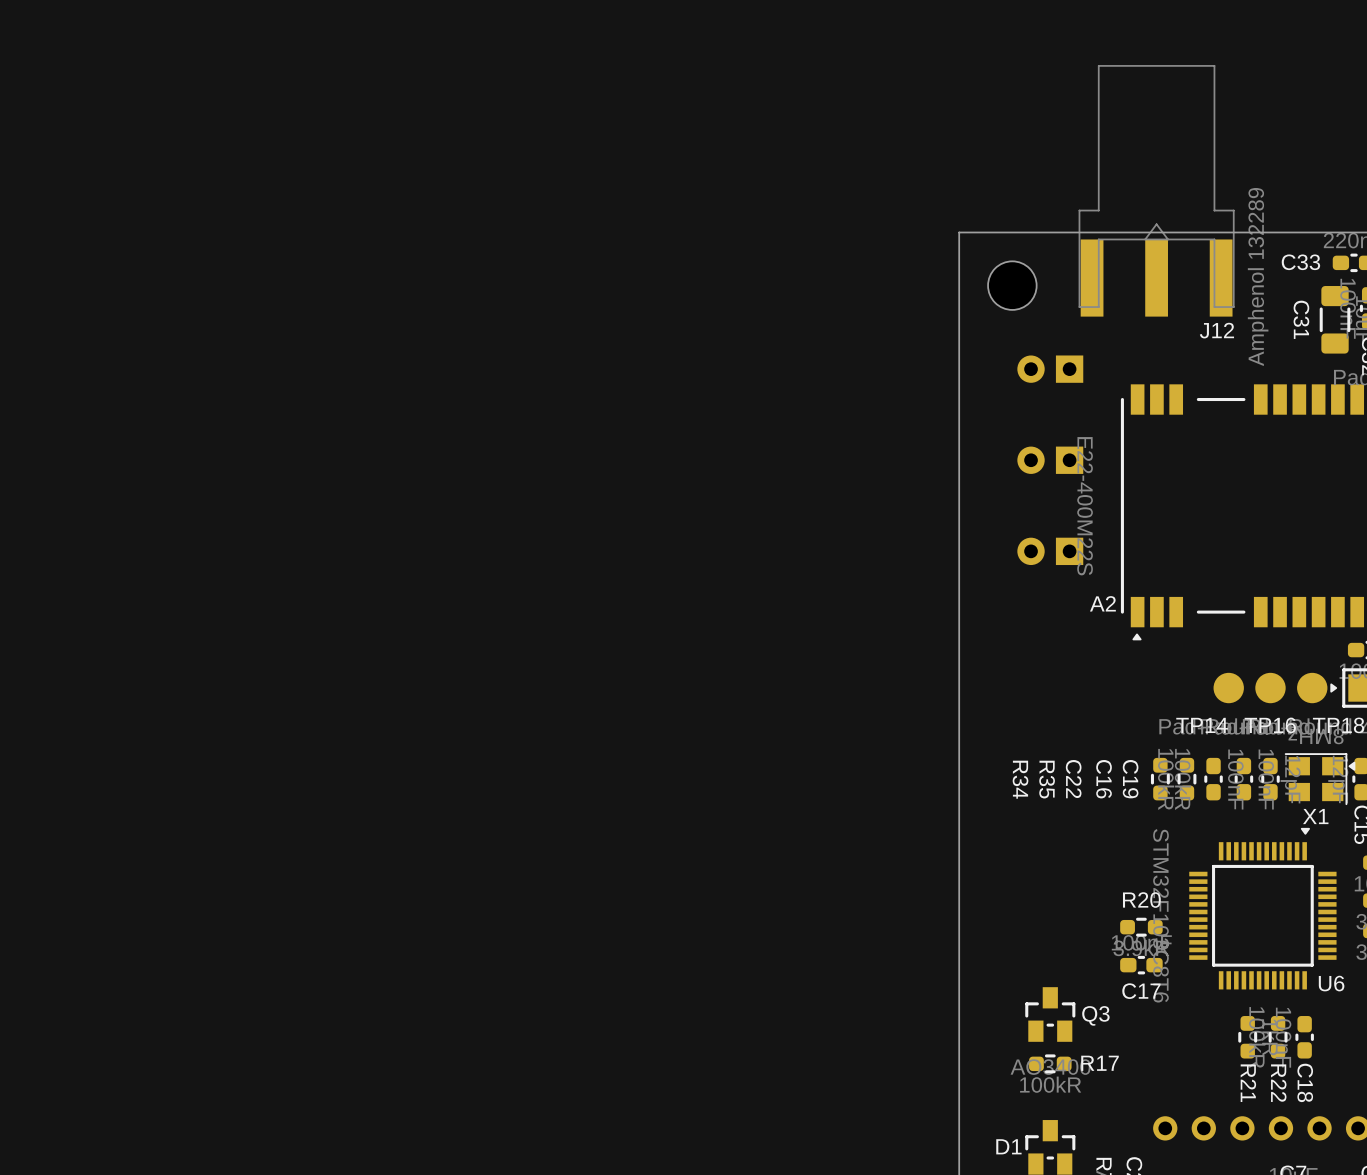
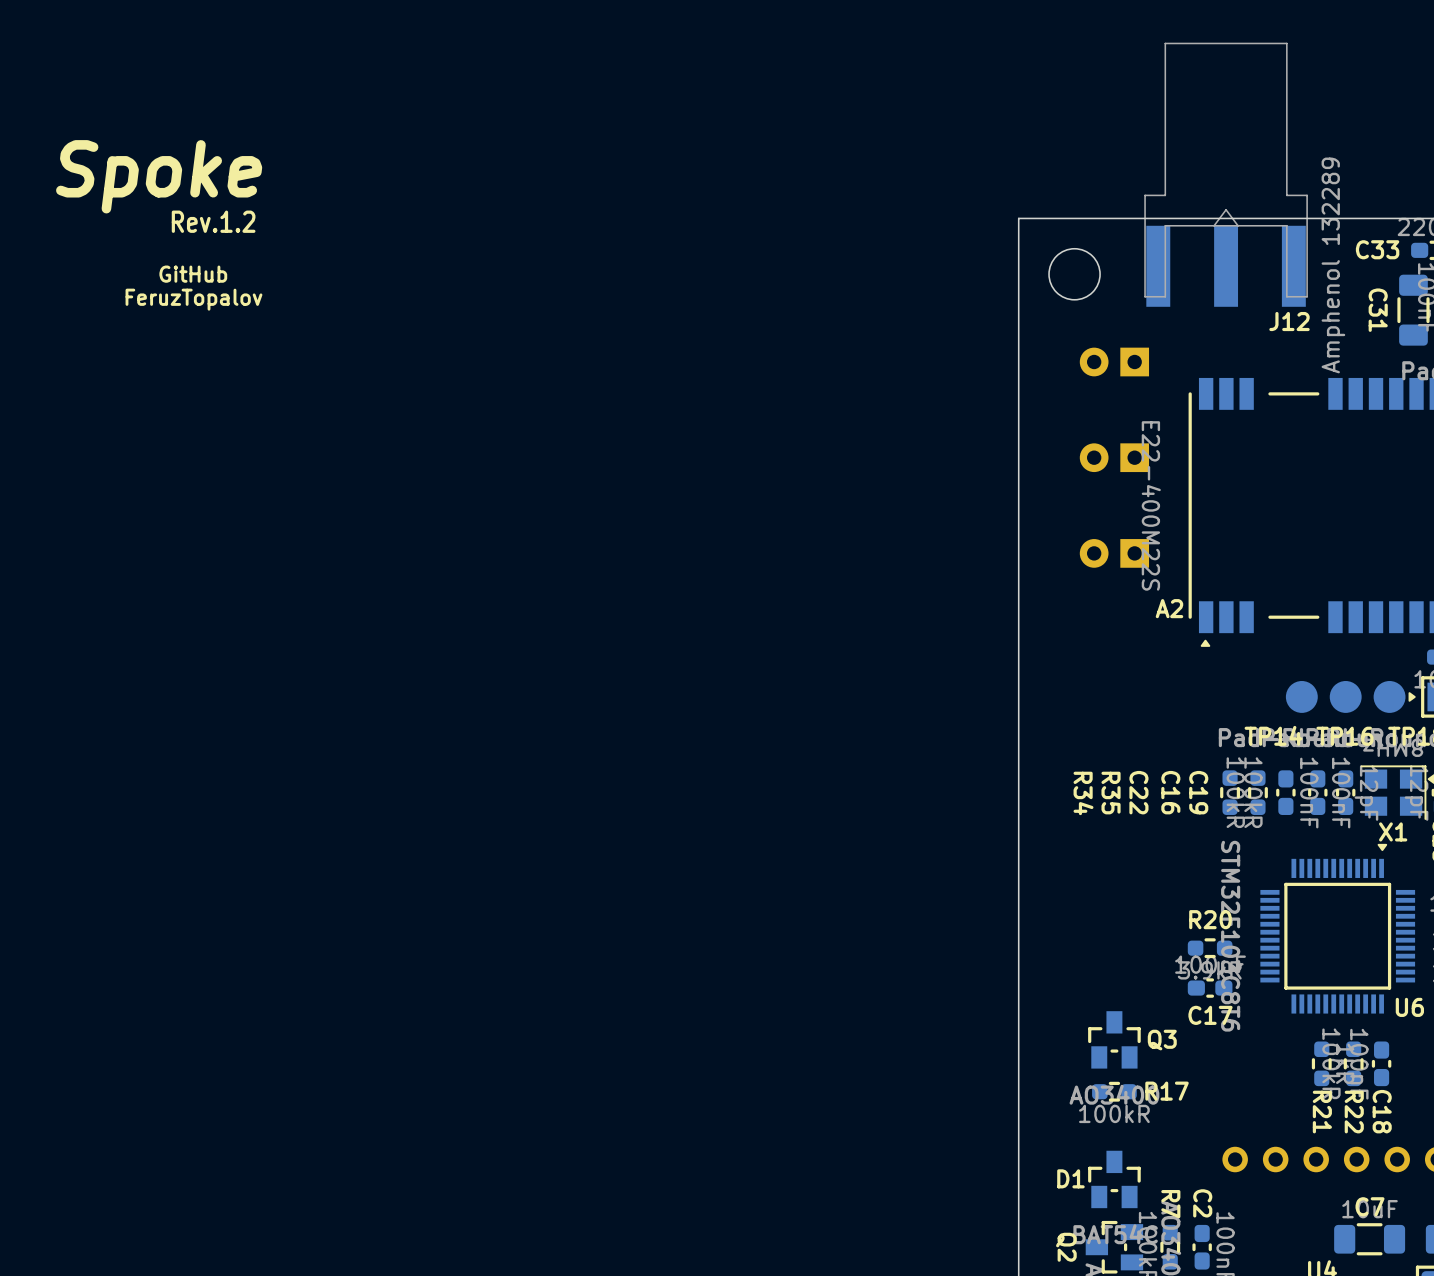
text: none -> Spoke (159, 176)
text: none -> Rev.1.2 (213, 221)
text: none -> GitHub (193, 274)
text: none -> FeruzTopalov (193, 299)

